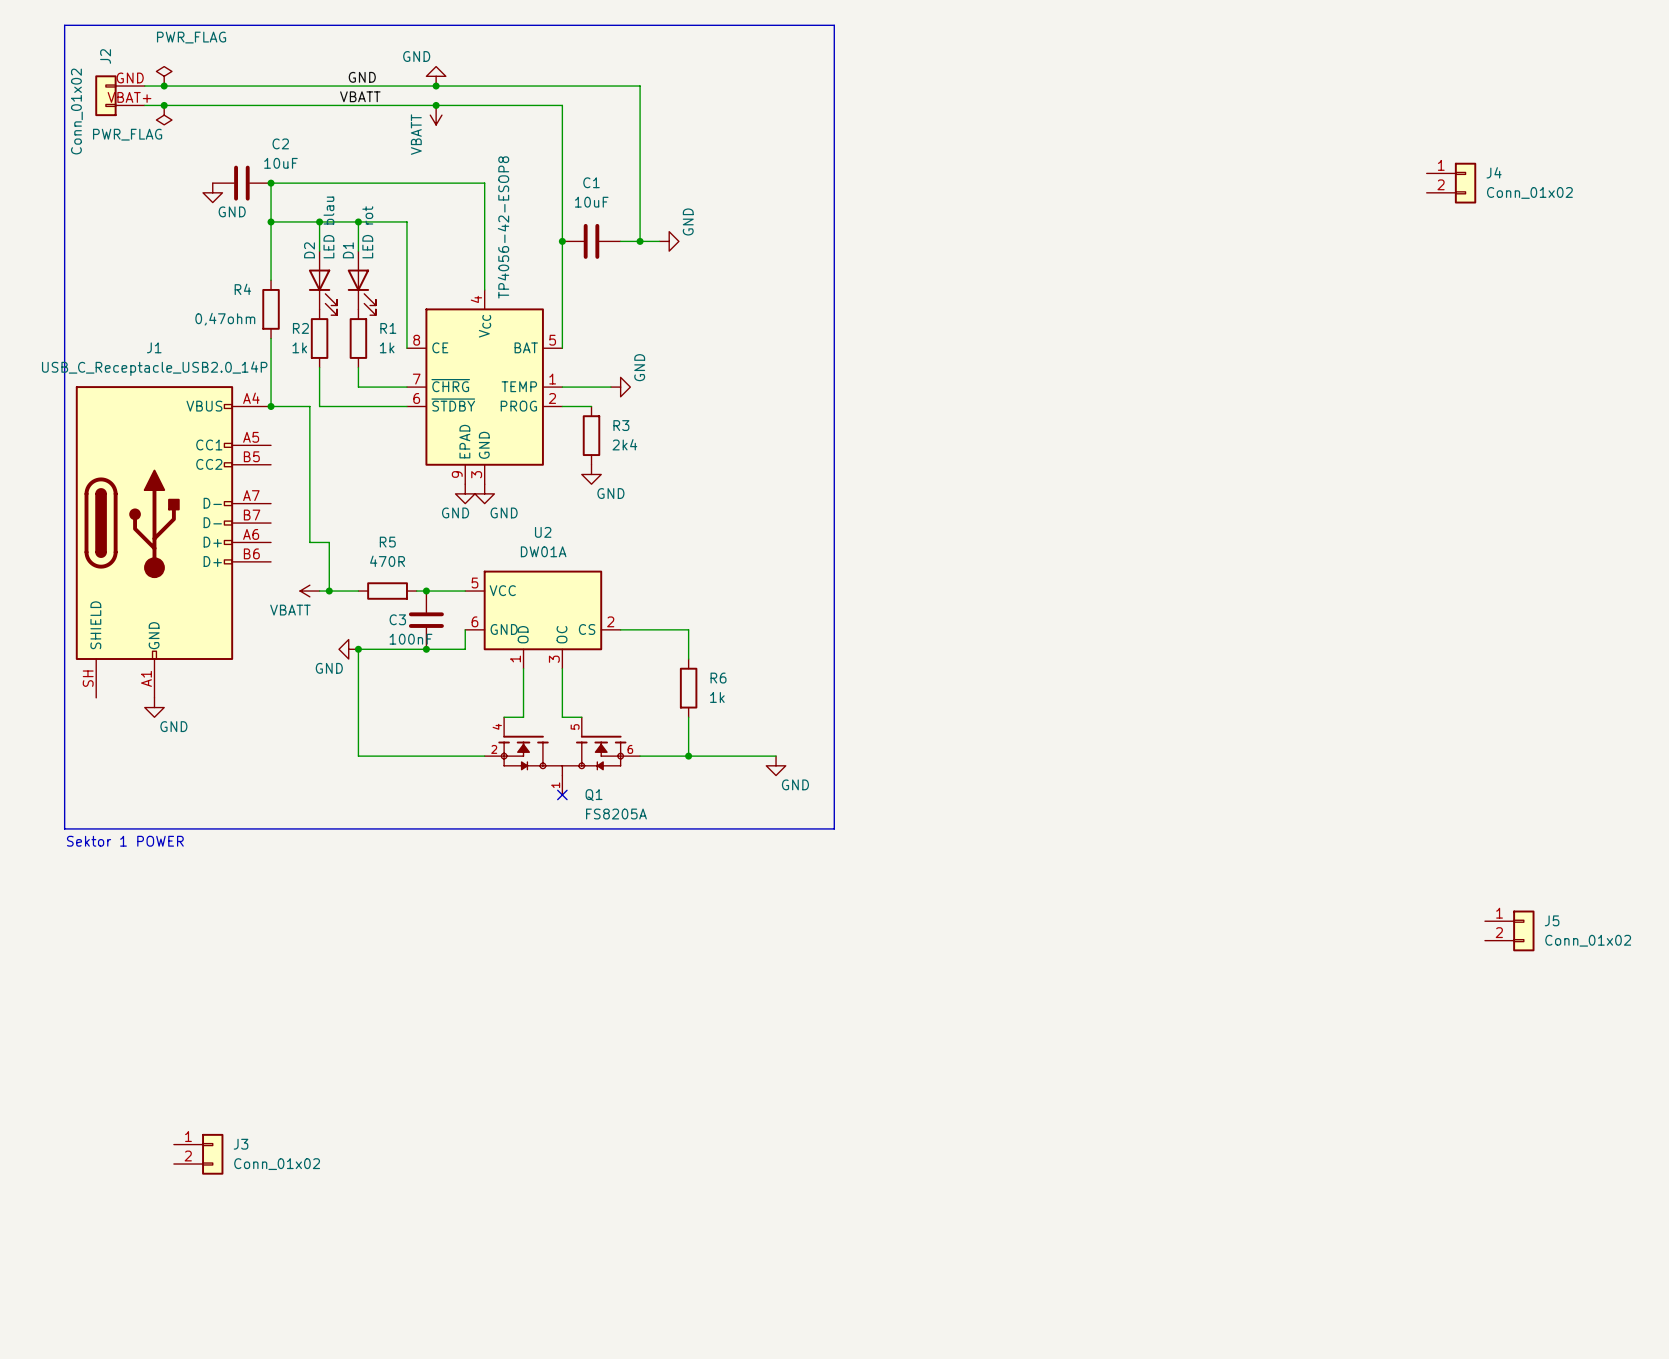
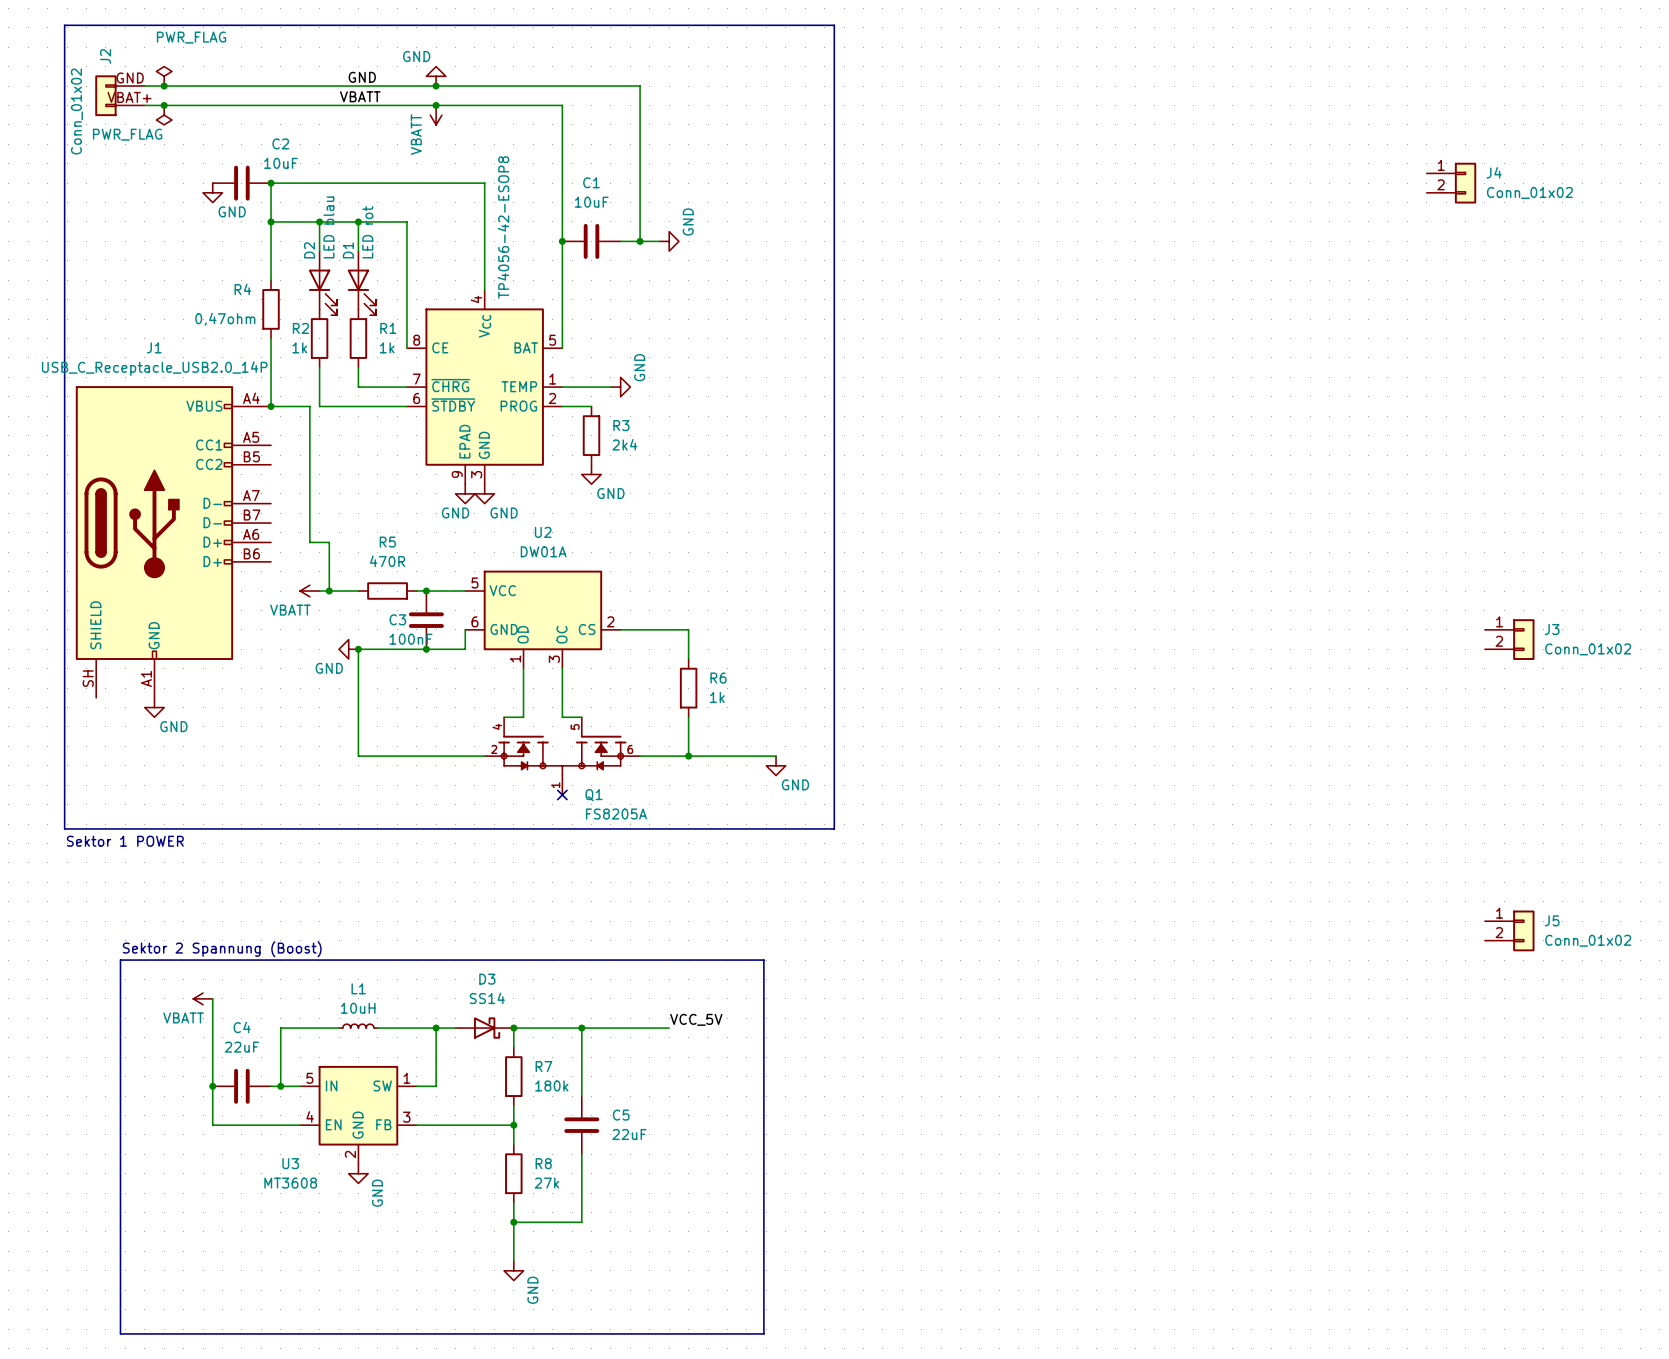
text: none -> Sektor 2 Spannung (Boost) (222, 949)
line: none -> (120, 960) (763, 960) (763, 1333) (120, 1333) (120, 960)
power symbol: none -> VBATT (203, 998)
wire: none -> (212, 998) (212, 1125) (300, 1125)
label: none -> VCC_5V (696, 1019)
L1: none -> 10uH (358, 1026)
wire: none -> (339, 1028) (280, 1028) (280, 1086)
wire: none -> (377, 1028) (455, 1028)
wire: none -> (436, 1028) (436, 1086) (416, 1086)
junction: none -> (436, 1028)
D3: none -> SS14 (484, 1028)
junction: none -> (513, 1028)
wire: none -> (581, 1028) (581, 1096)
junction: none -> (581, 1028)
wire: none -> (669, 1028) (513, 1028) (513, 1047)
R7: none -> 180k (513, 1076)
junction: none -> (212, 1086)
C4: none -> 22uF (241, 1086)
wire: none -> (271, 1086) (300, 1086)
junction: none -> (280, 1086)
wire: none -> (513, 1105) (513, 1144)
U3: none -> MT3608 (358, 1114)
wire: none -> (416, 1125) (513, 1125)
junction: none -> (513, 1125)
C5: none -> 22uF (581, 1125)
J3 position: (198, 1154) -> (1509, 639)
wire: none -> (581, 1154) (581, 1222) (513, 1222)
power symbol: none -> GND (358, 1173)
R8: none -> 27k (513, 1173)
wire: none -> (513, 1202) (513, 1261)
junction: none -> (513, 1222)
power symbol: none -> GND (513, 1270)

